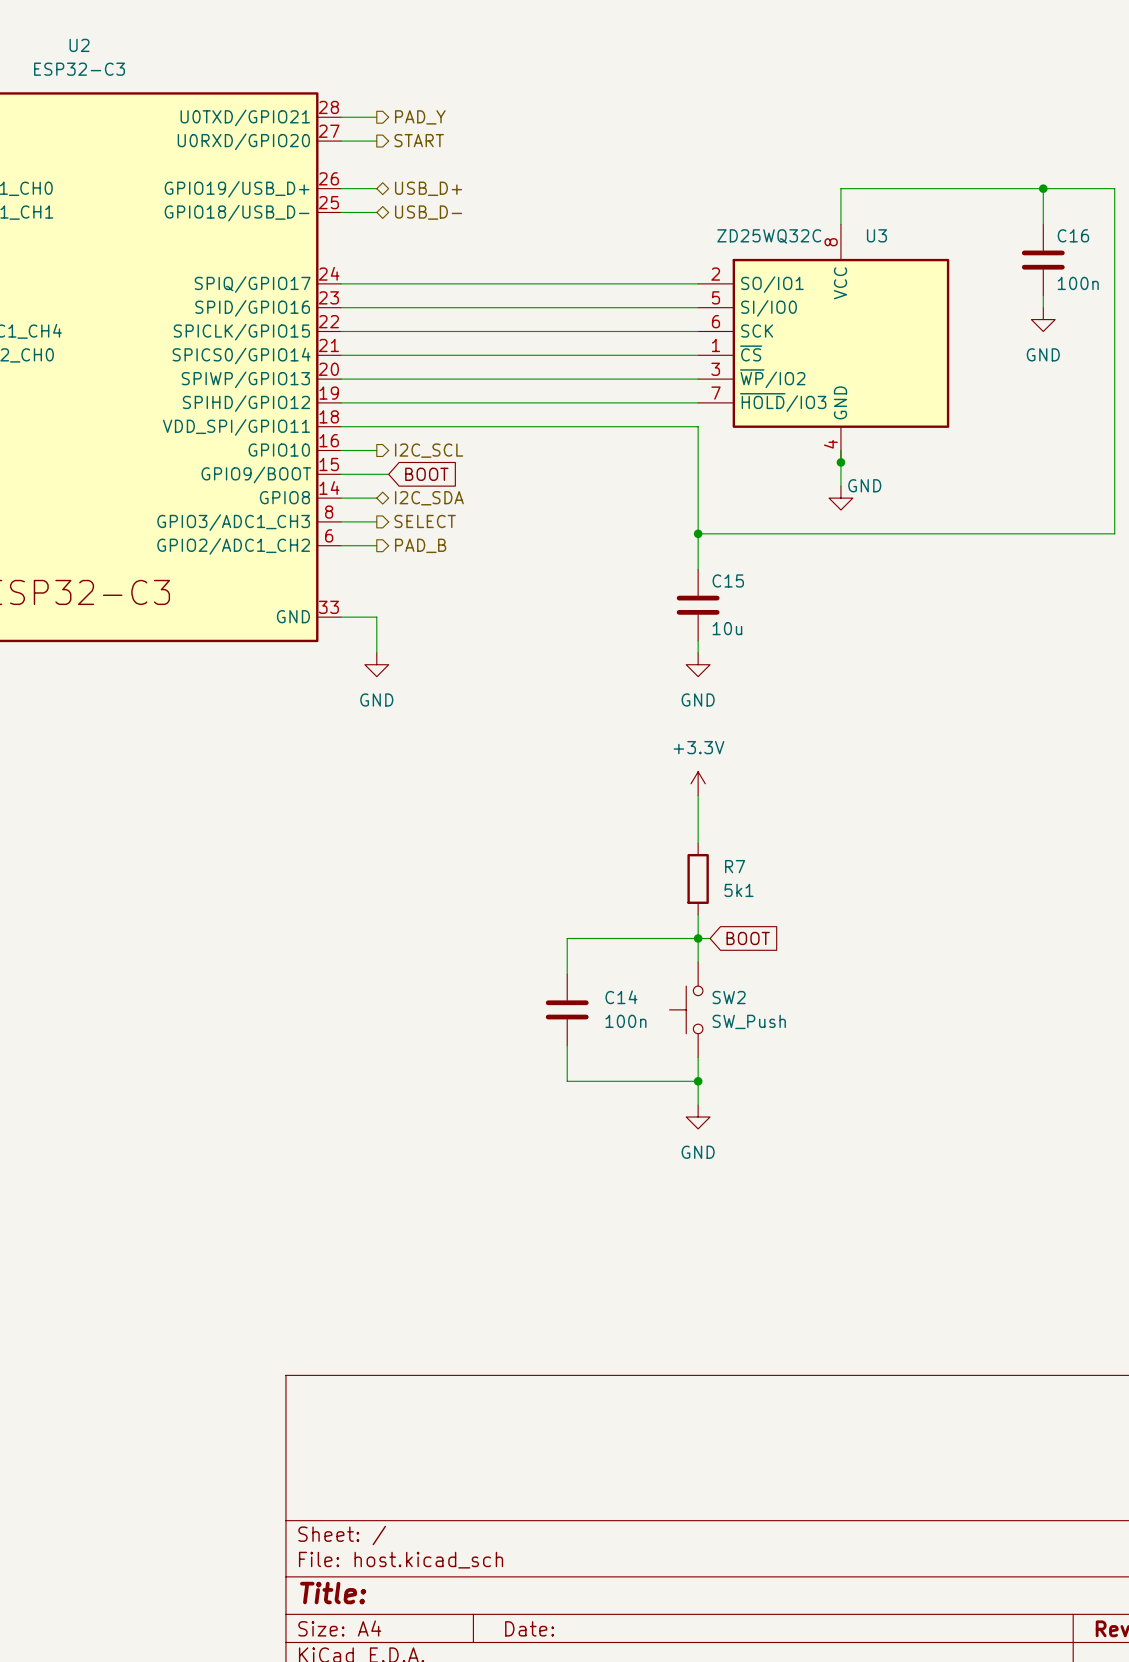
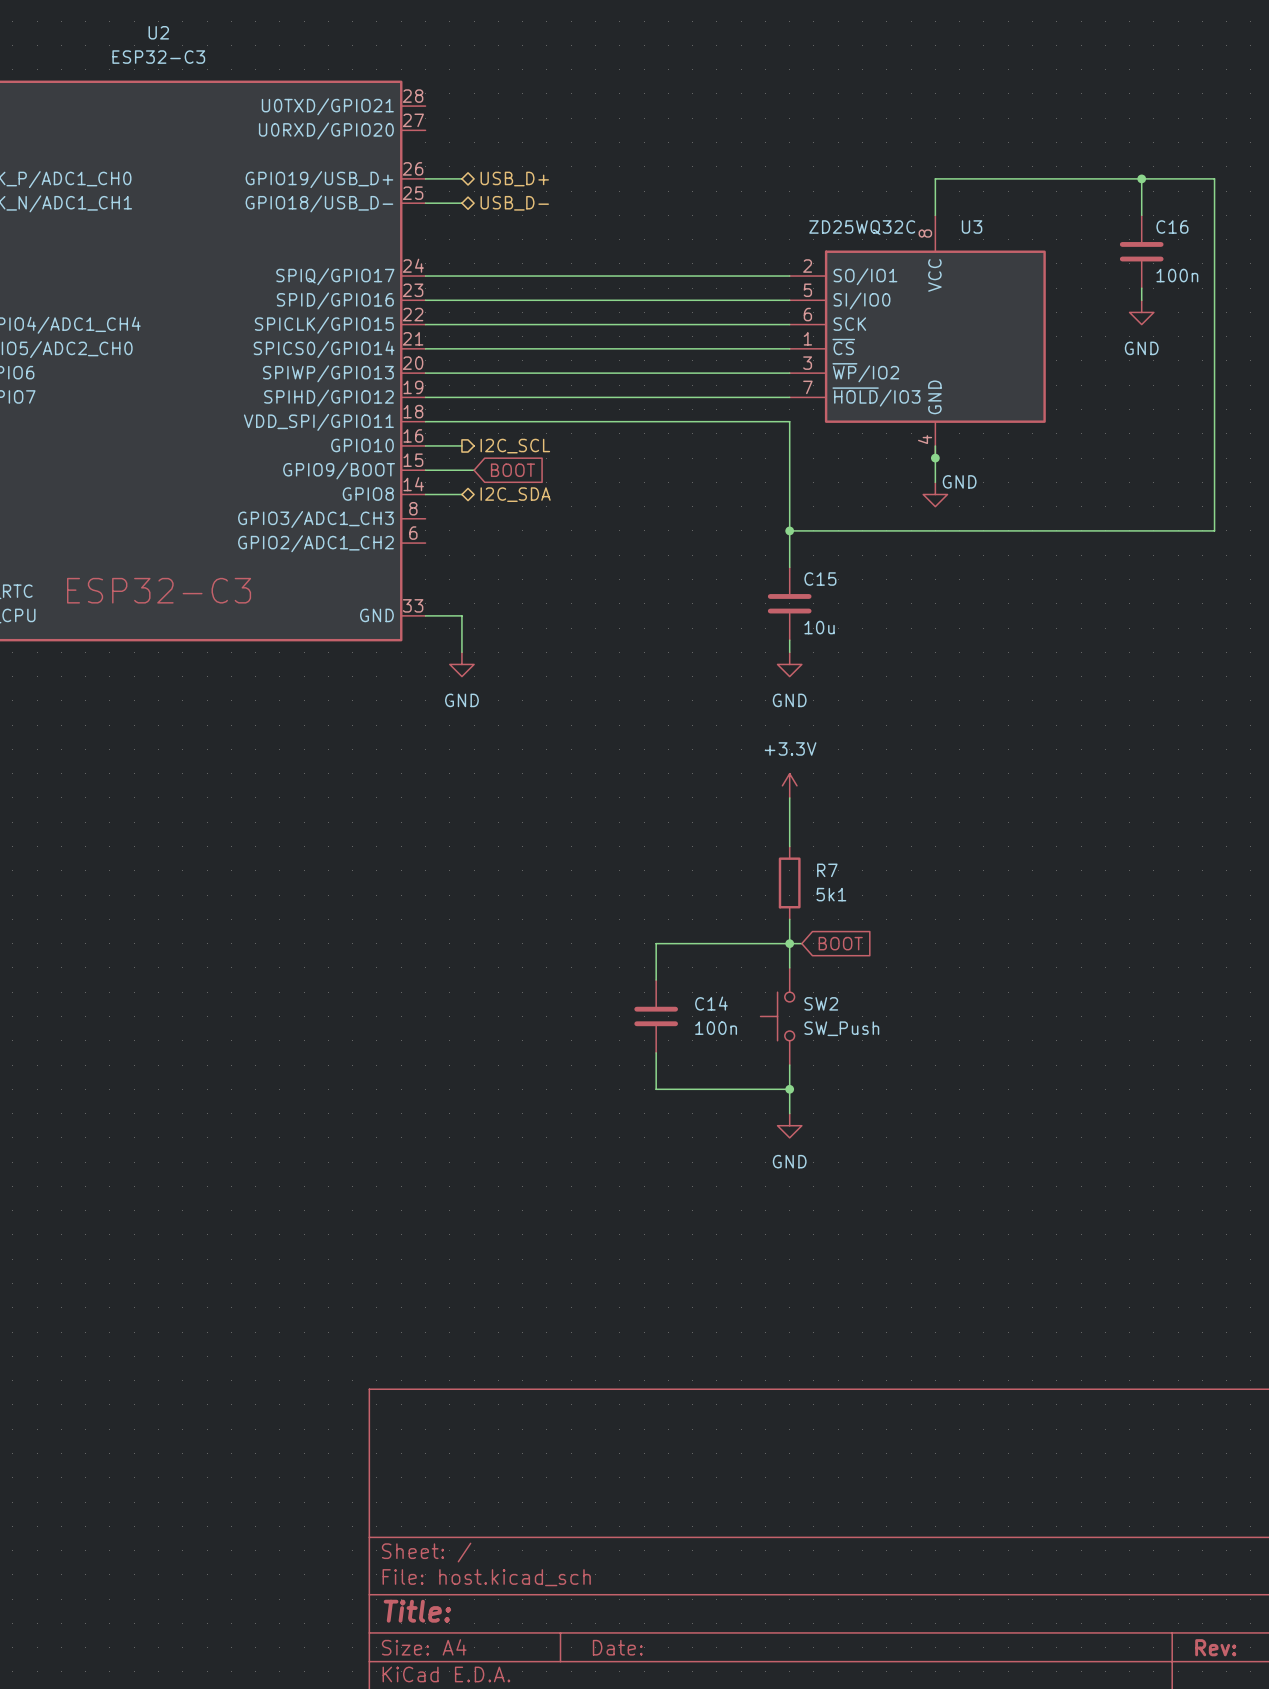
wire: (341, 117) (376, 117) -> none
hierarchical label: PAD_Y (420, 117) -> none
hierarchical label: START (419, 140) -> none
wire: (341, 141) (376, 141) -> none
wire: (341, 521) (376, 521) -> none
hierarchical label: SELECT (425, 521) -> none
wire: (341, 545) (376, 545) -> none
hierarchical label: PAD_B (420, 545) -> none

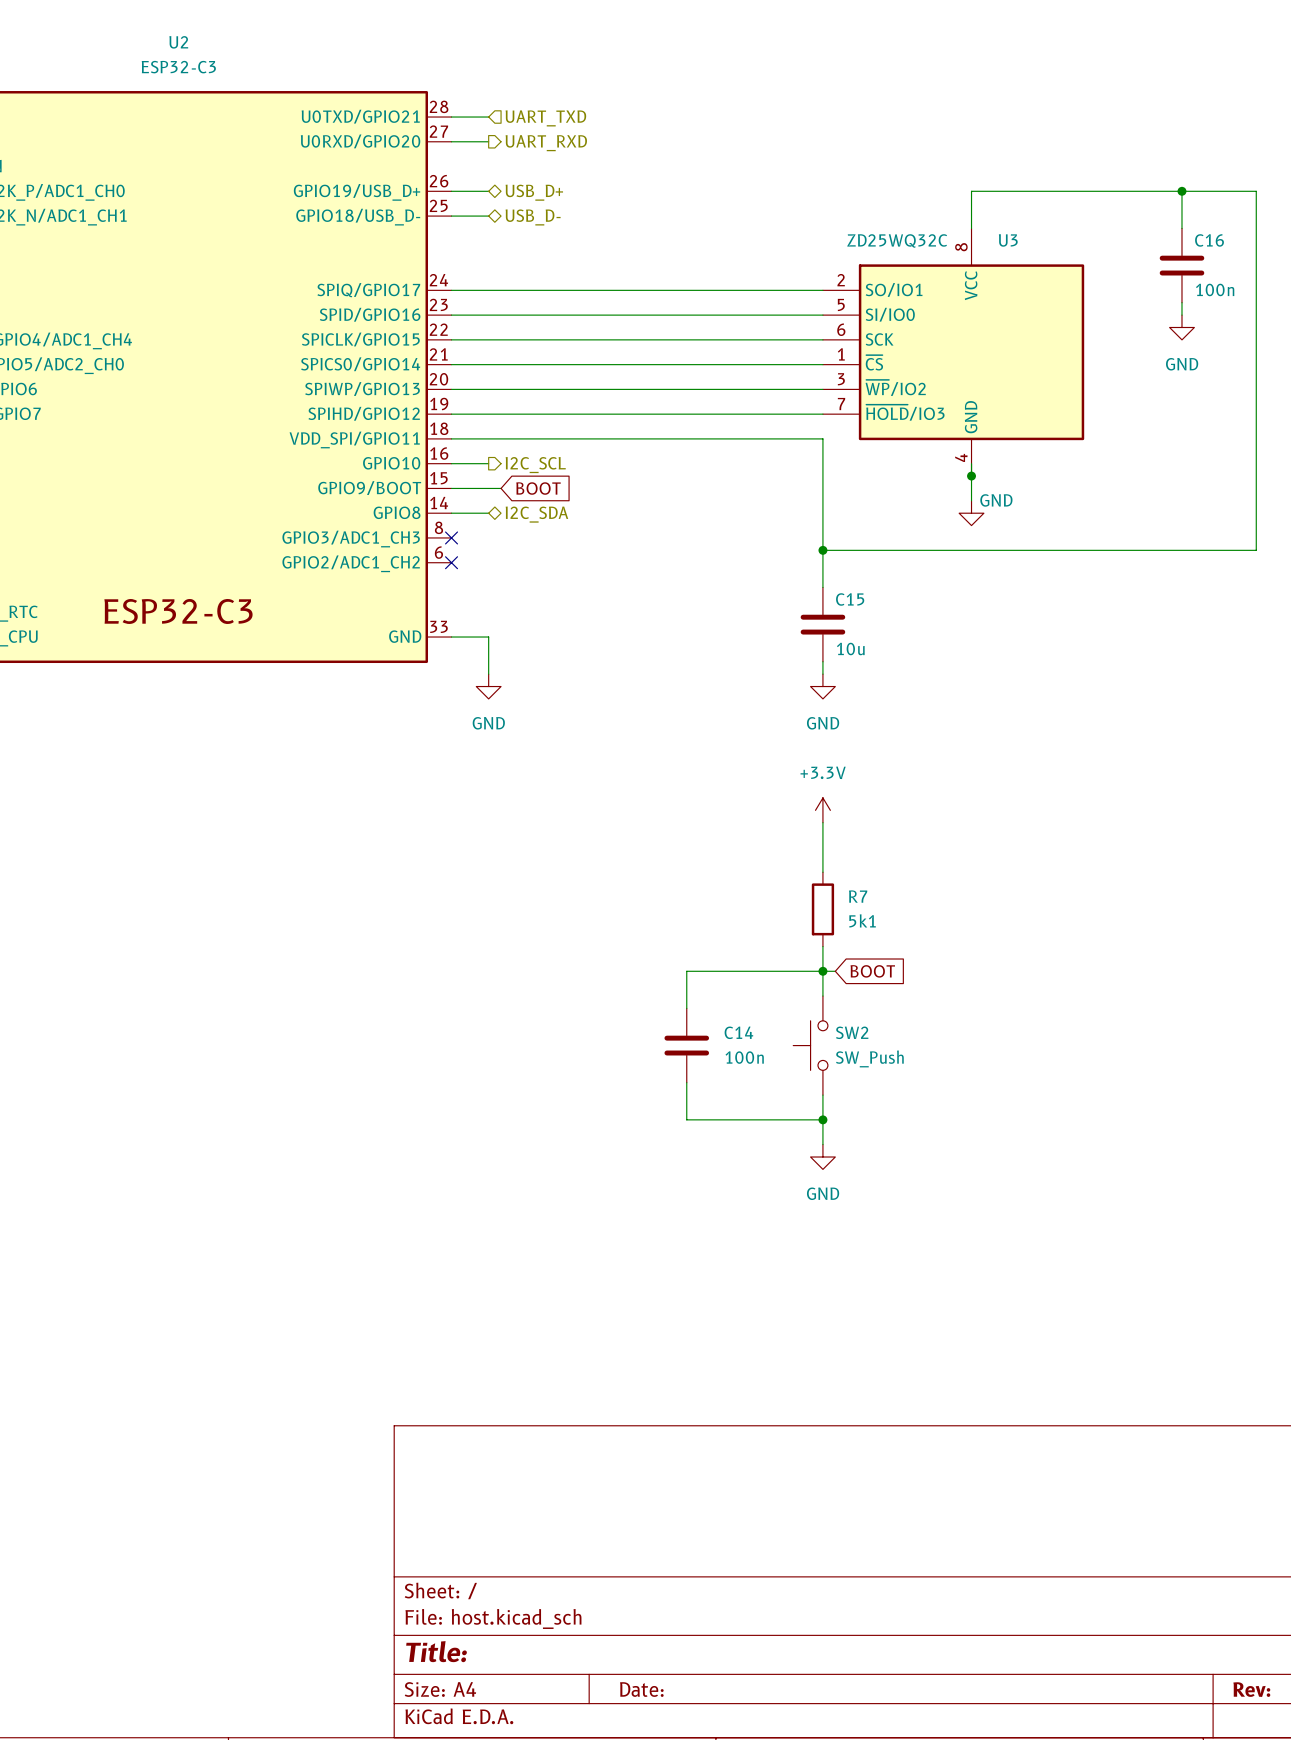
wire: none -> (451, 117) (488, 117)
hierarchical label: none -> UART_TXD (545, 118)
wire: none -> (451, 141) (488, 141)
hierarchical label: none -> UART_RXD (546, 143)
no-connect mark: none -> (451, 537)
no-connect mark: none -> (451, 562)

